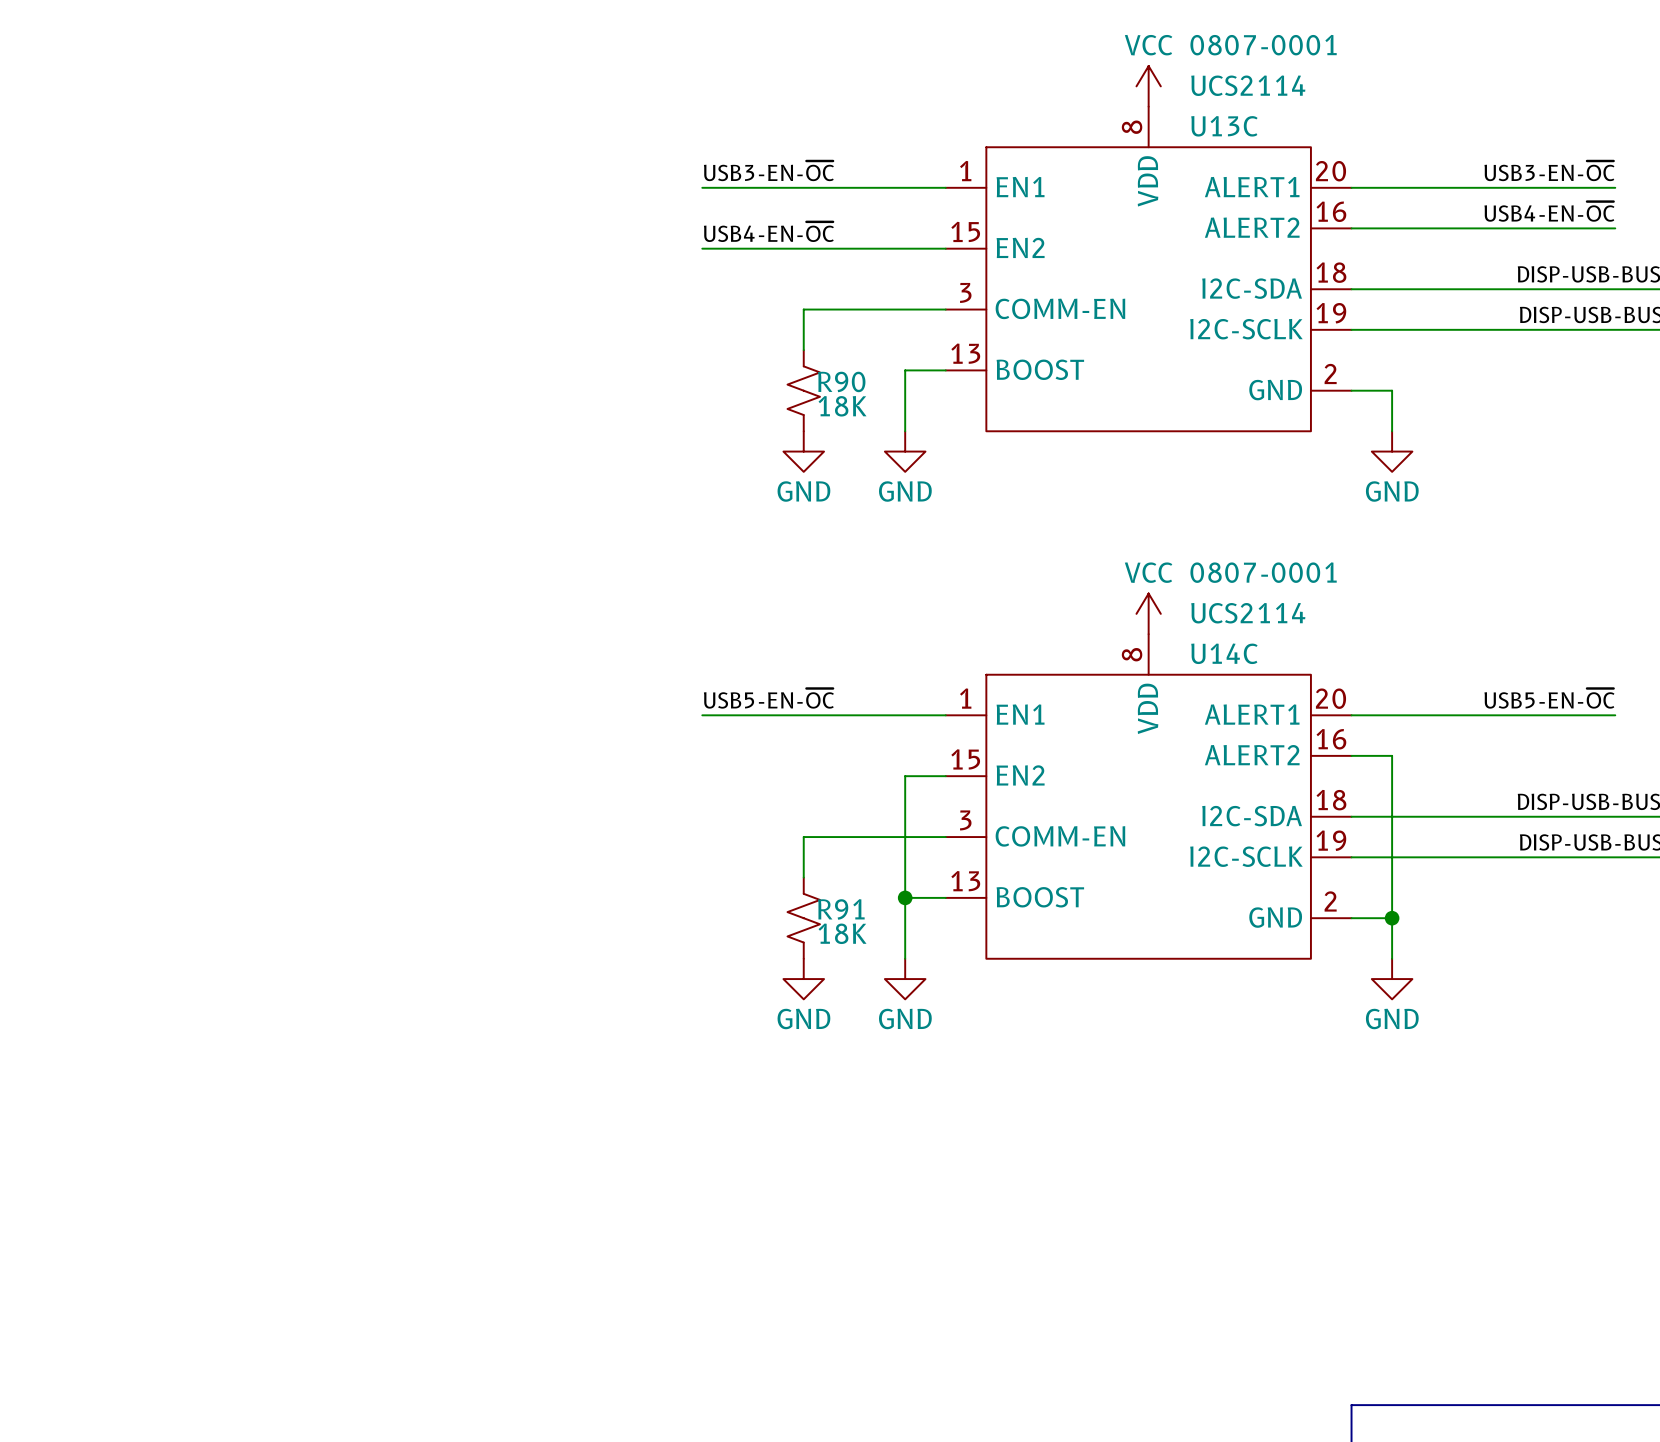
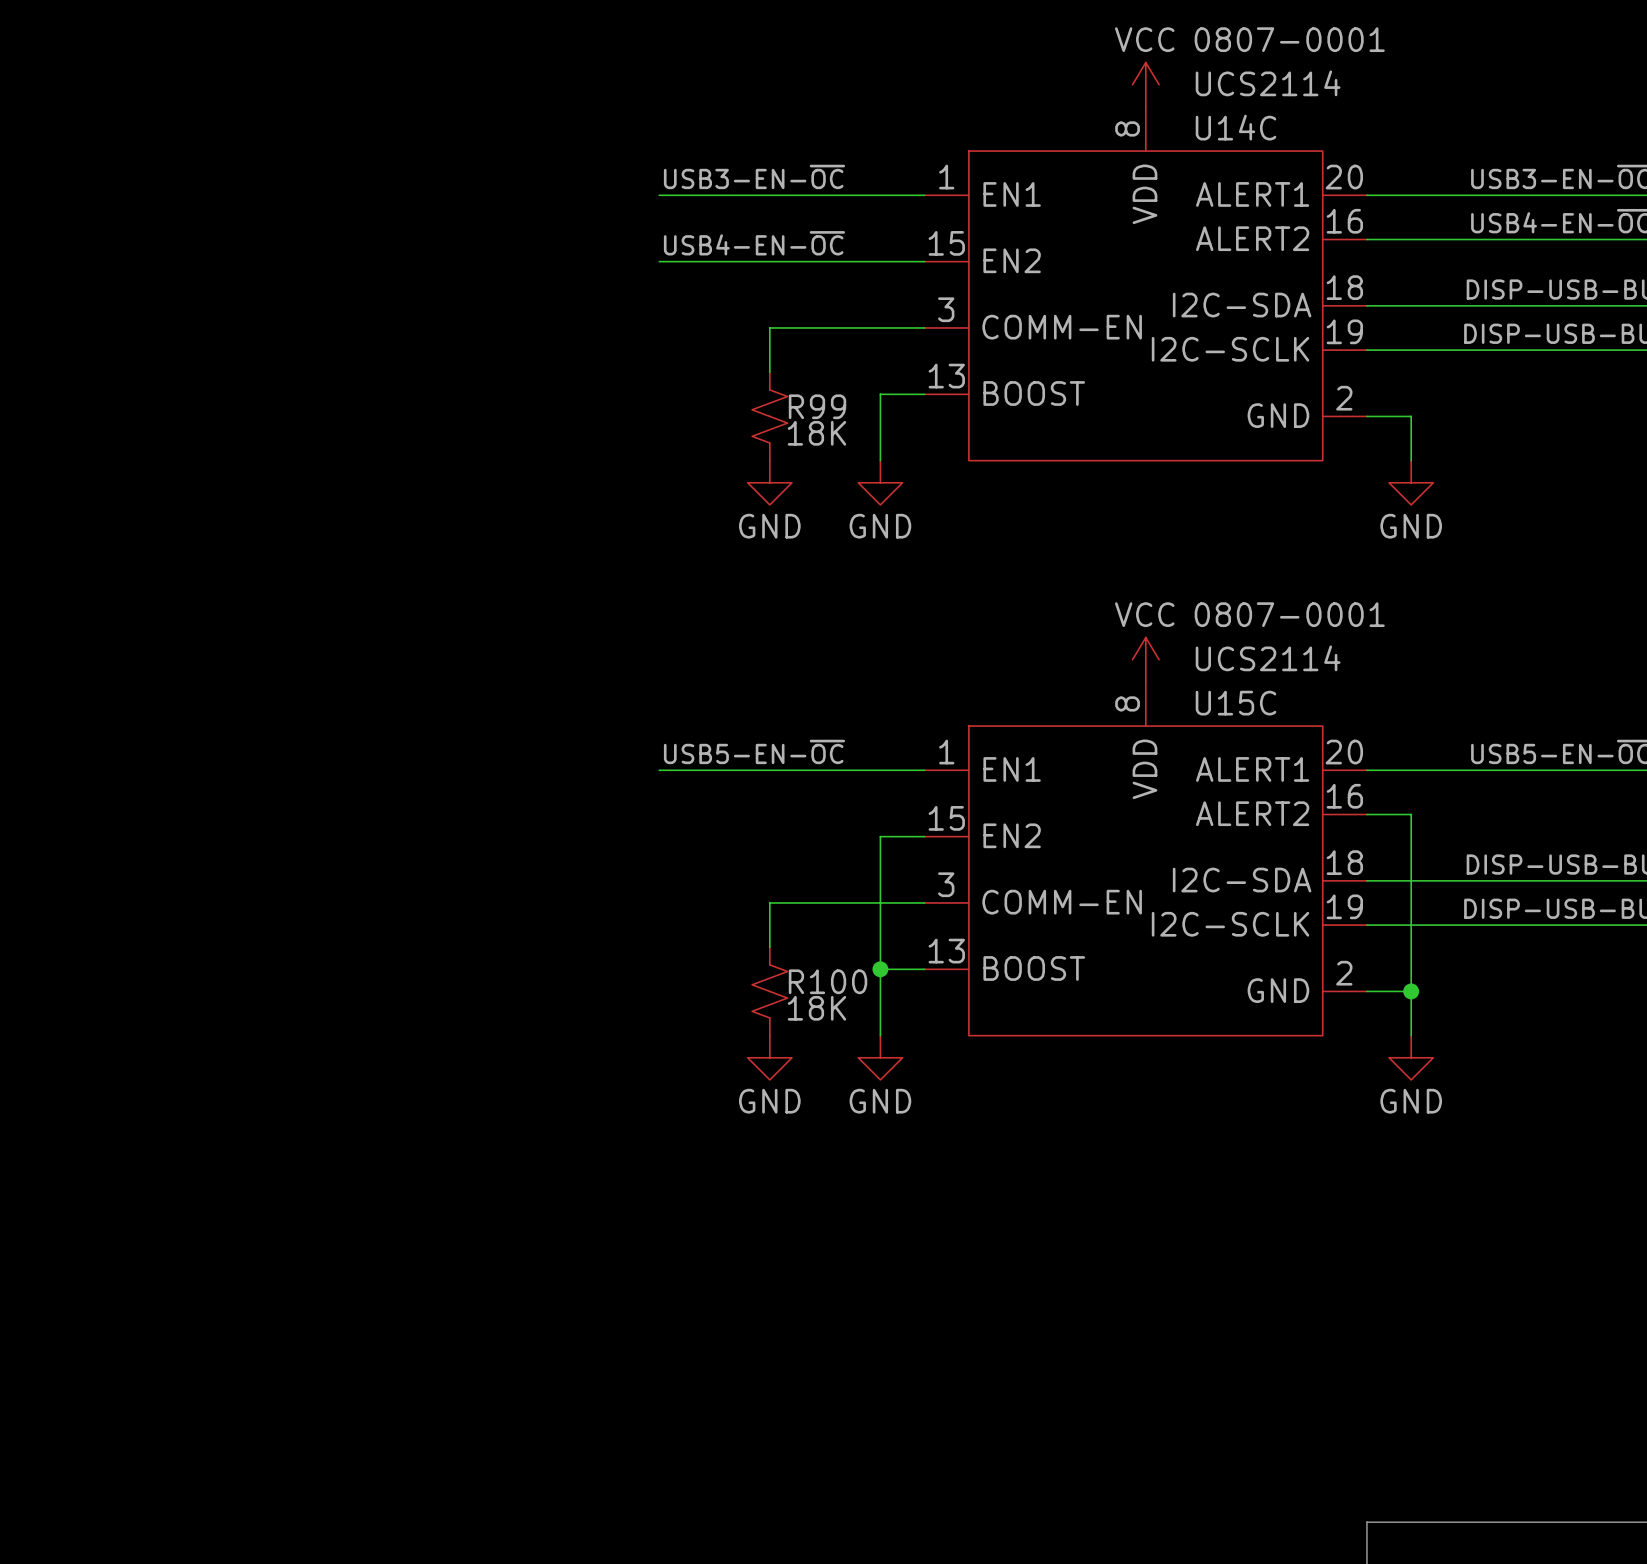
U13C name: U13C (1224, 126) -> U14C (1236, 127)
R90 name: R90 (841, 381) -> R99 (817, 406)
U14C name: U14C (1224, 653) -> U15C (1236, 703)
R91 name: R91 (841, 909) -> R100 (828, 981)

